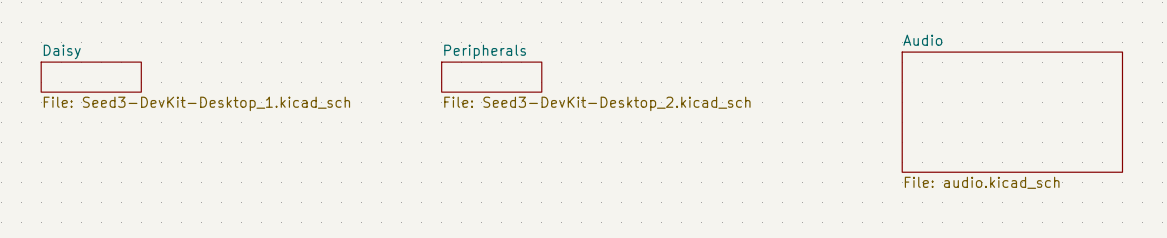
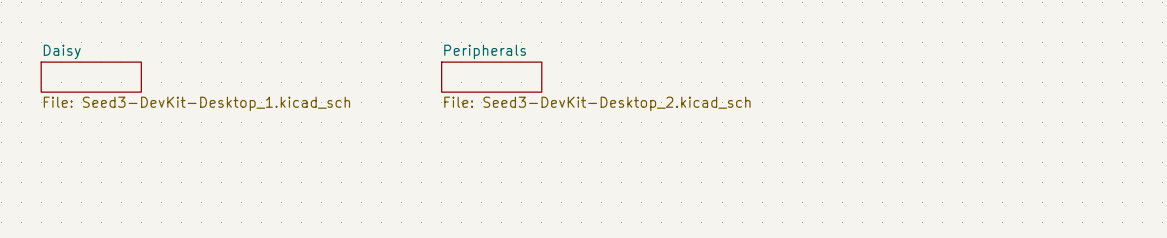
sheet Audio: File: audio.kicad_sch (1012, 112) -> none

